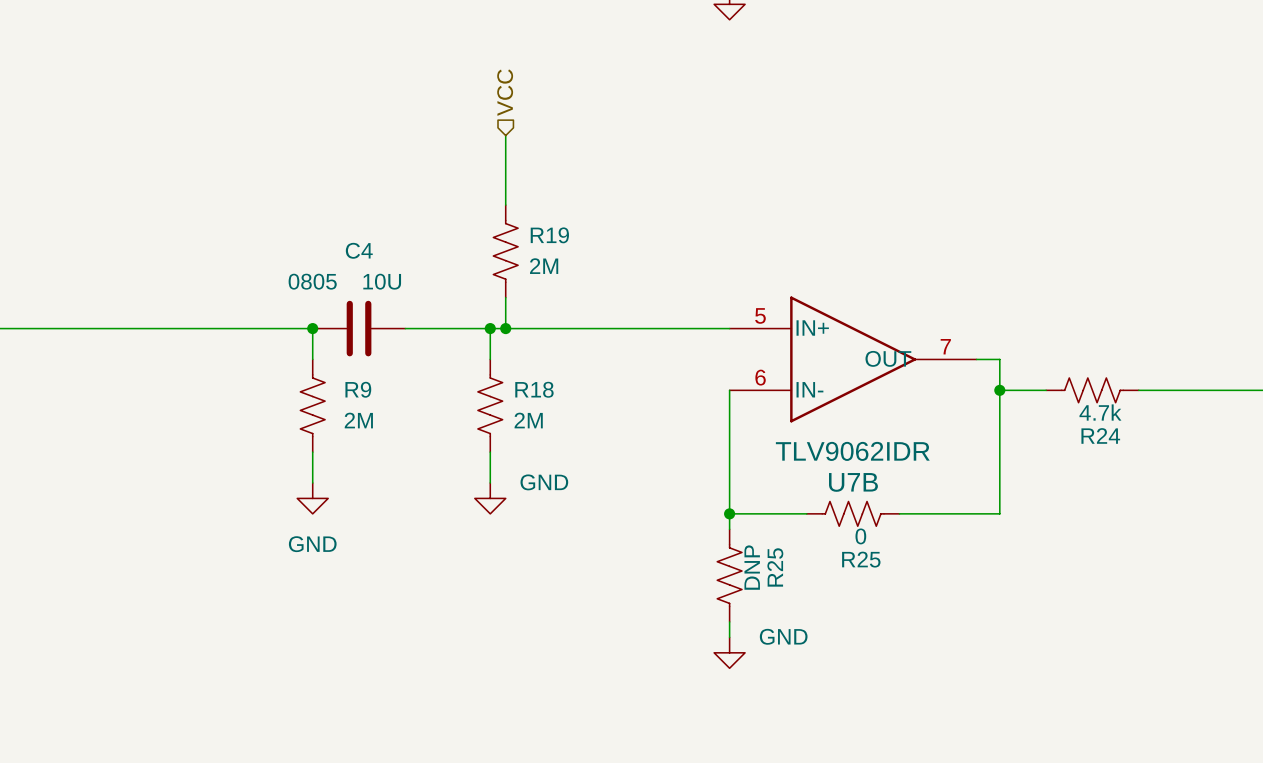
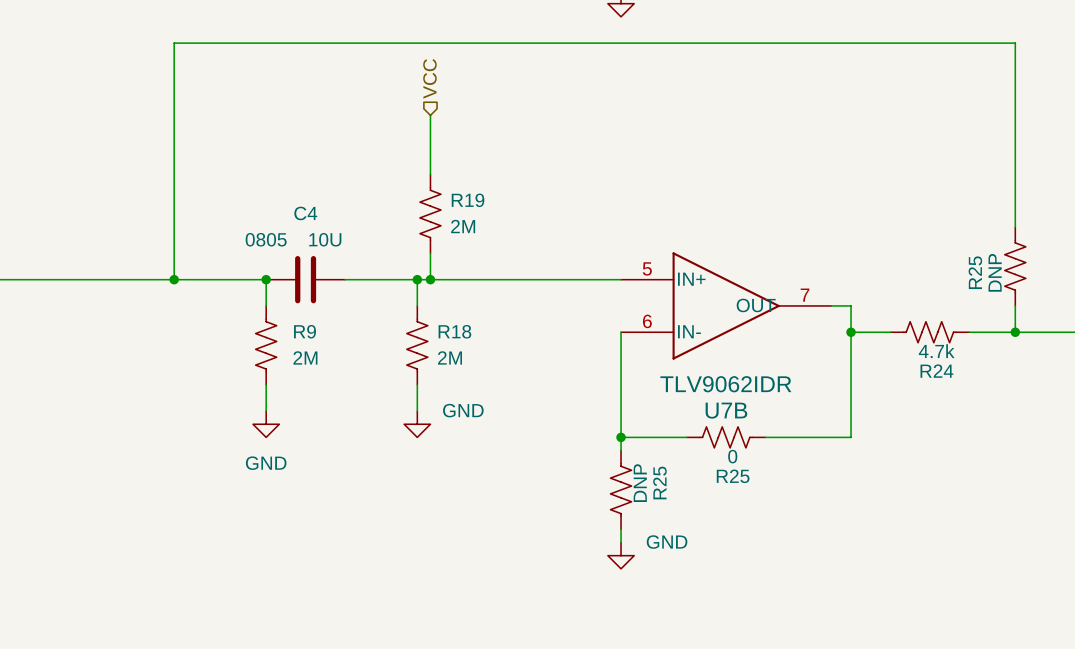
wire: none -> (1015, 227) (1015, 43) (174, 43) (174, 279)
R25: none -> DNP (1015, 266)
junction: none -> (174, 279)
wire: none -> (1015, 305) (1015, 332)
junction: none -> (1015, 332)

